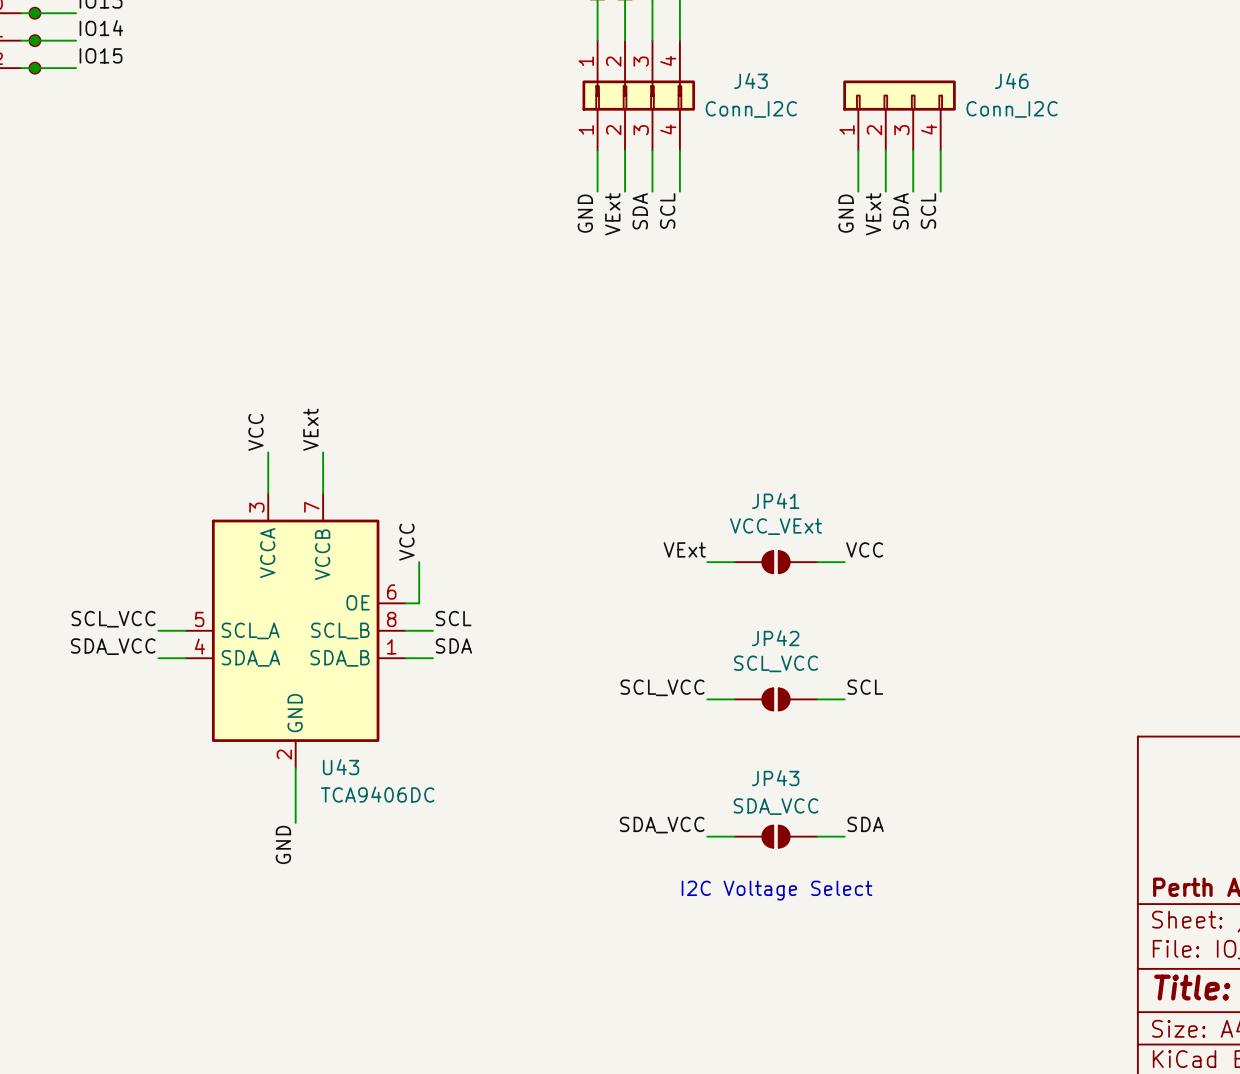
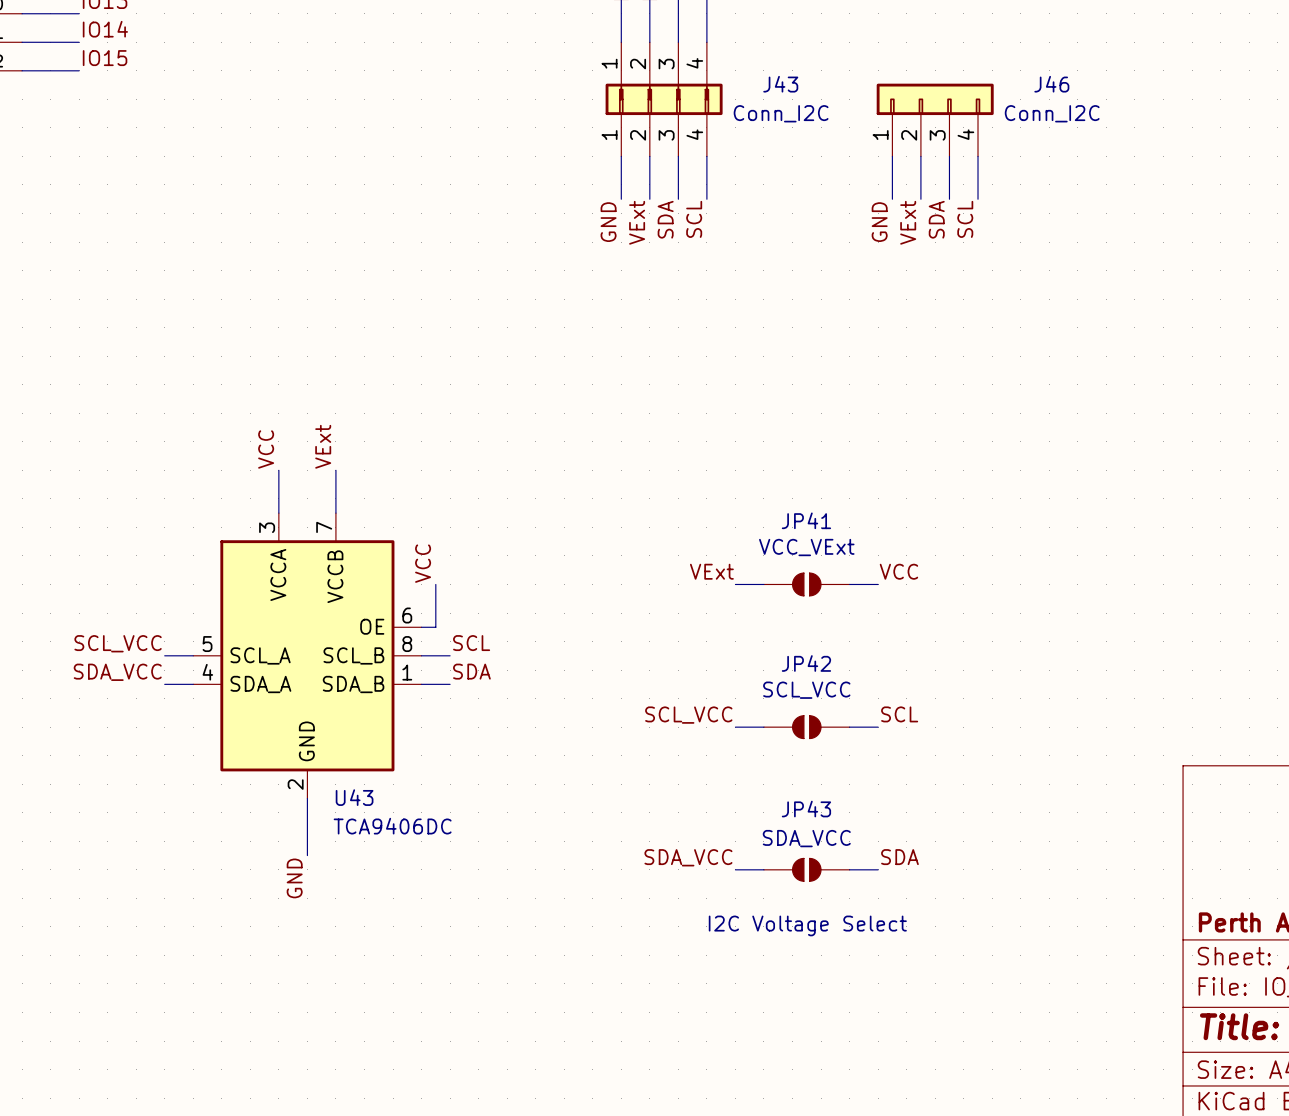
junction: (34, 13) -> none
part: (34, 13) -> none
junction: (34, 40) -> none
part: (34, 40) -> none
junction: (34, 68) -> none
part: (34, 68) -> none

